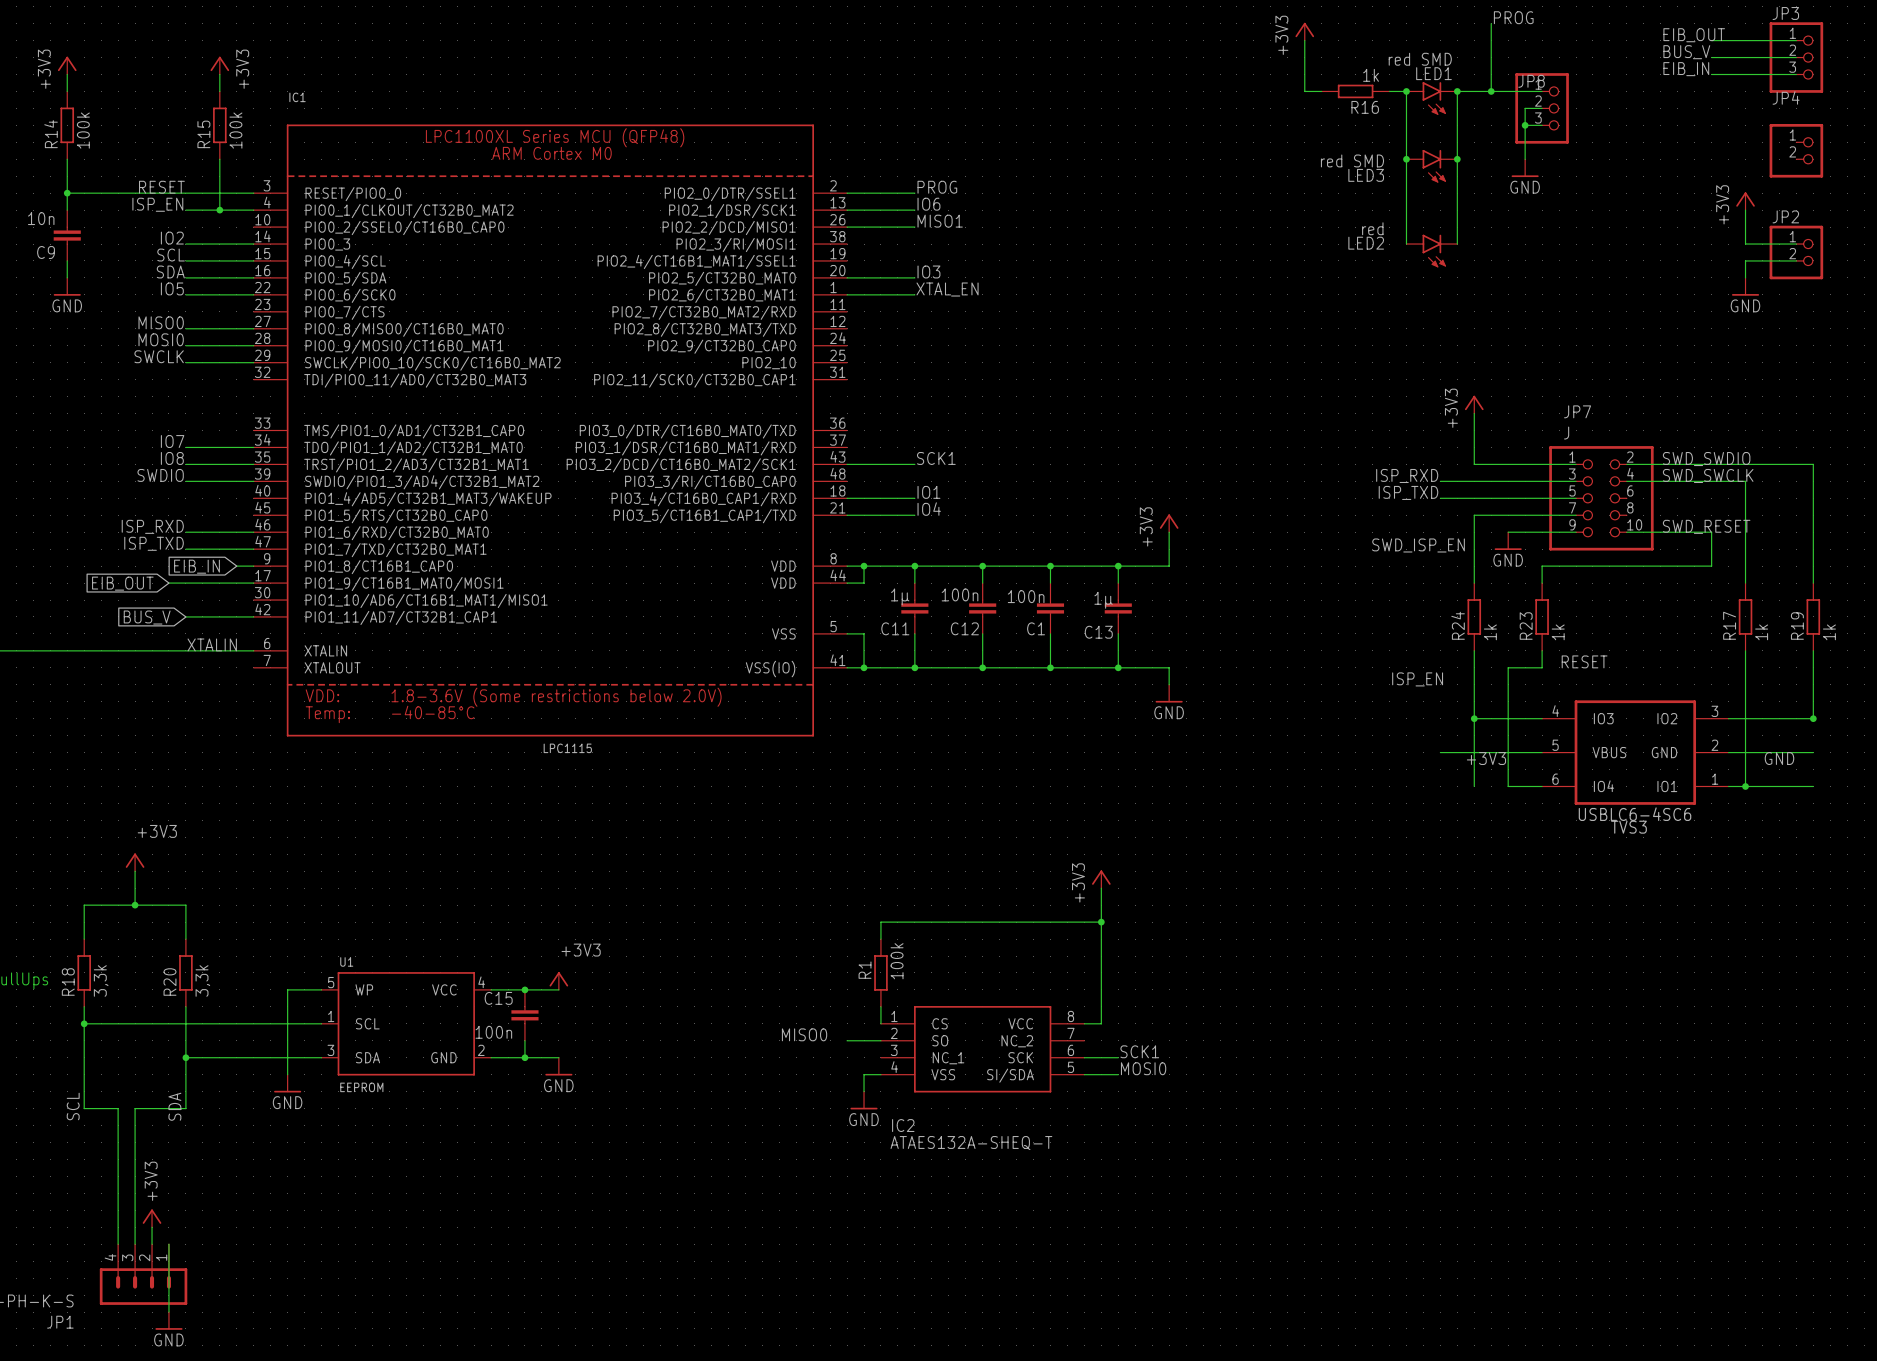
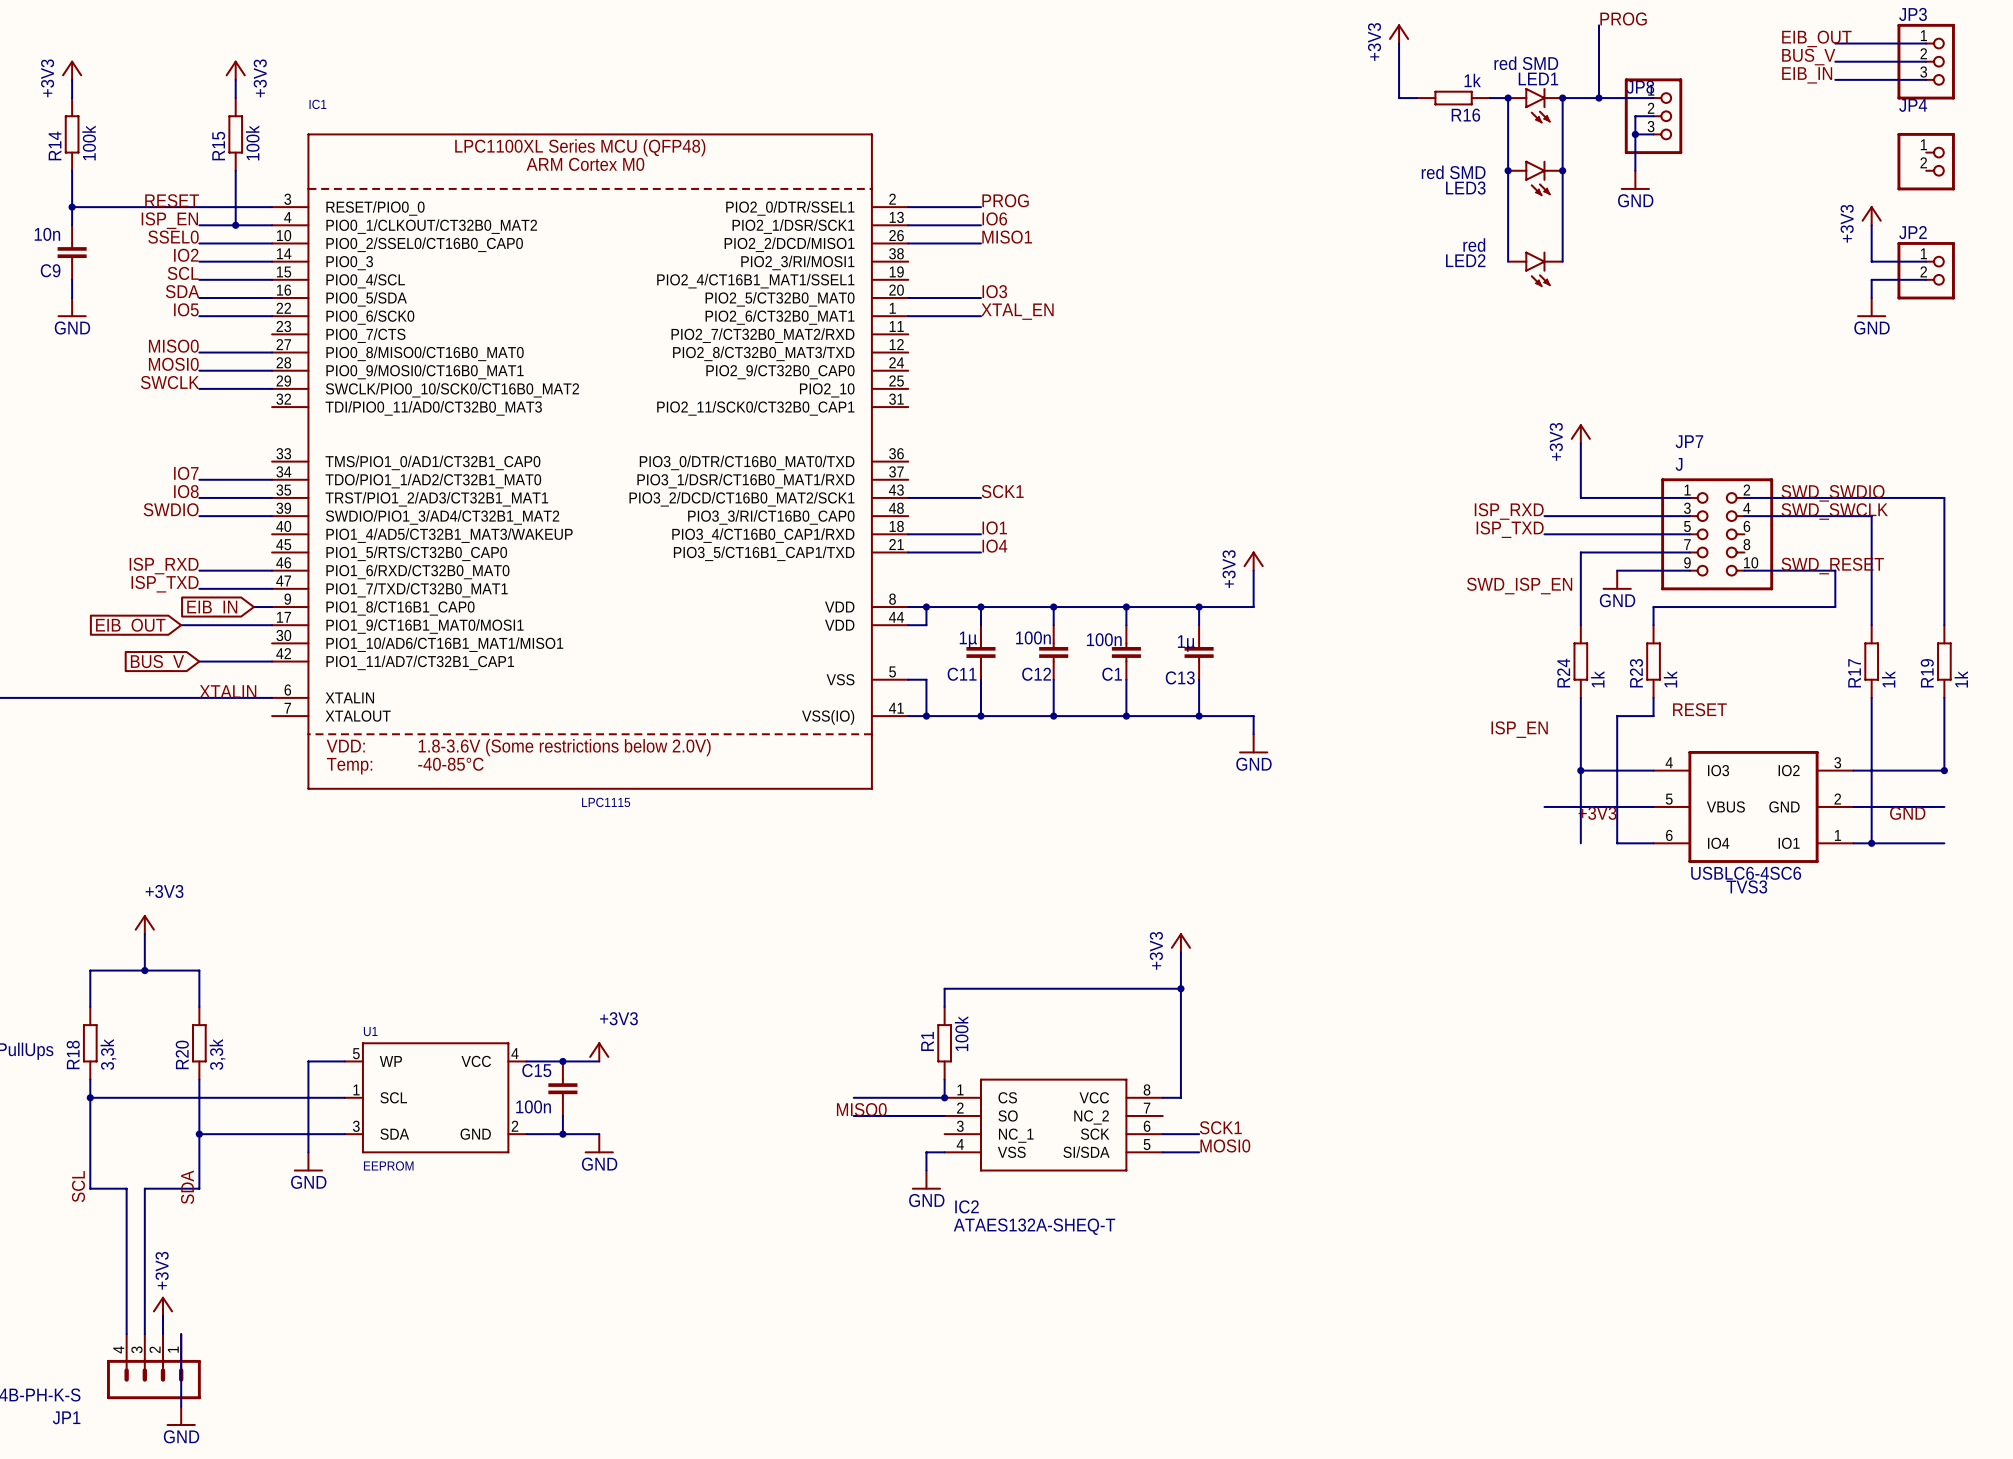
label: none -> SSEL0 (173, 237)
wire: none -> (199, 243) (272, 243)
wire: none -> (853, 1097) (944, 1097)
junction: none -> (944, 1097)
wire: none -> (853, 1115) (908, 1115)

